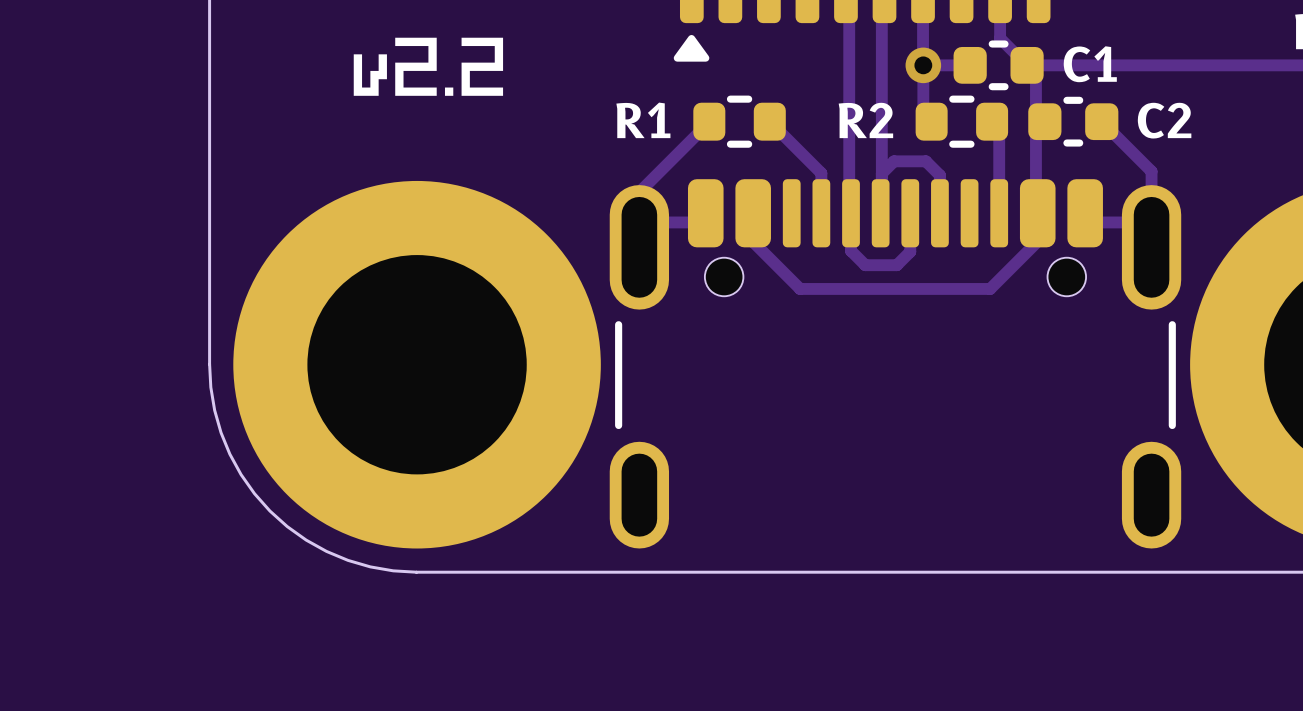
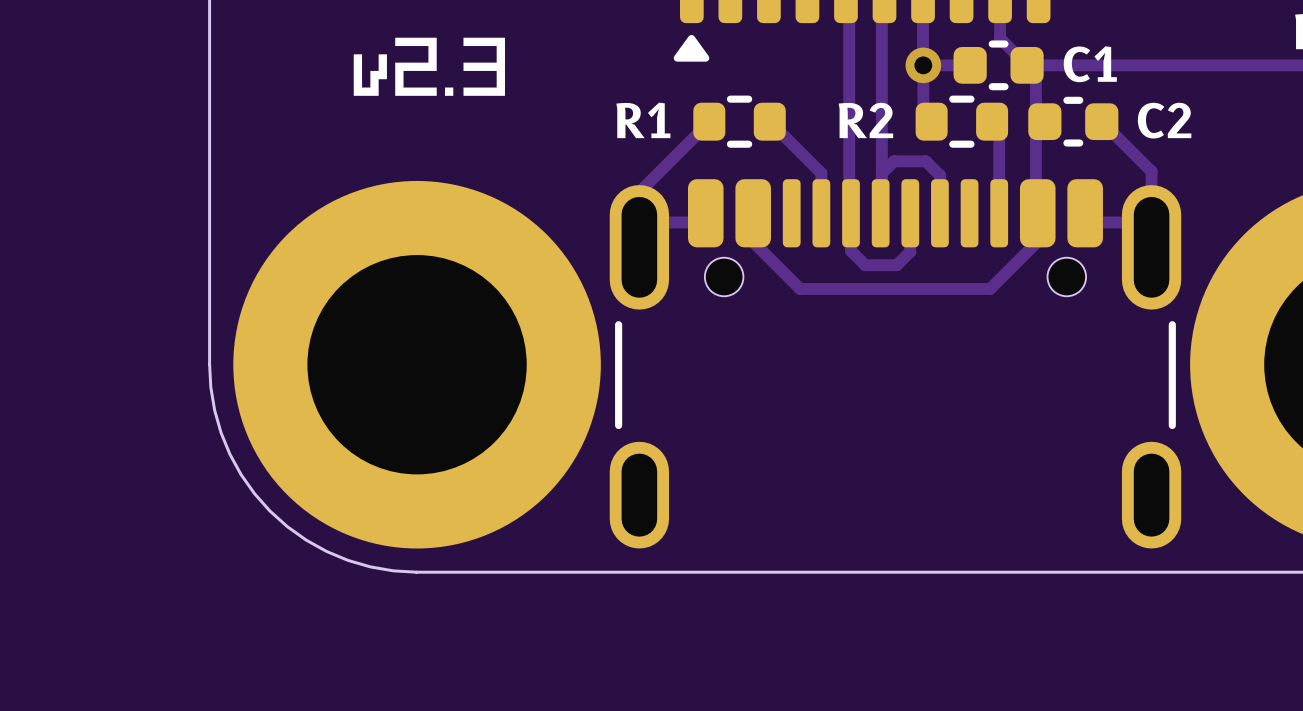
drawing shape: [461, 37, 504, 96] -> [463, 37, 505, 96]

